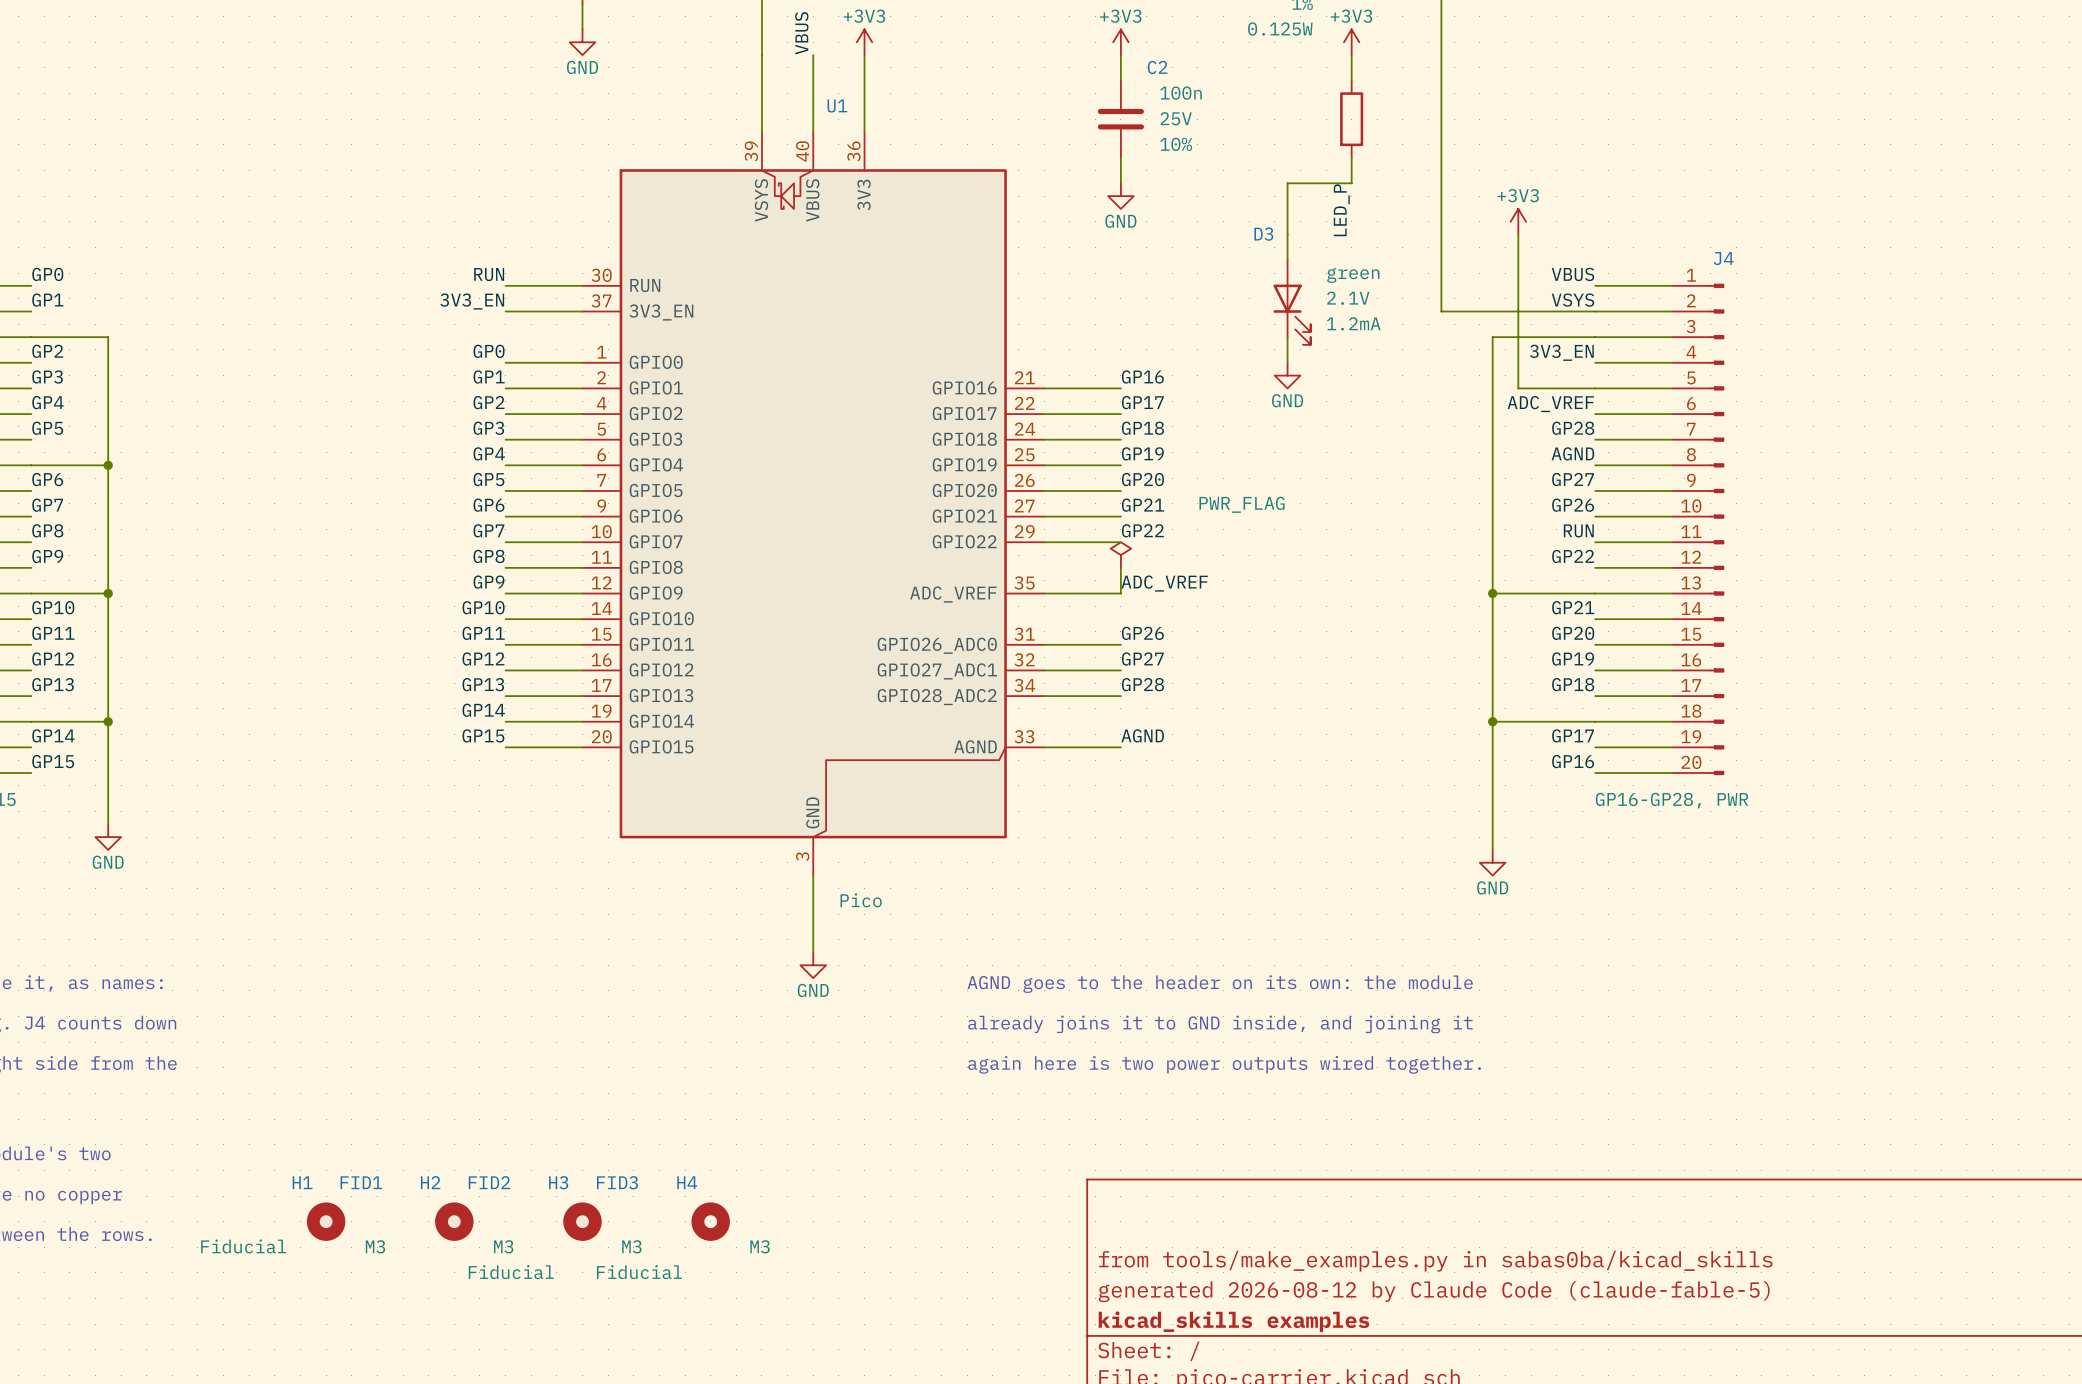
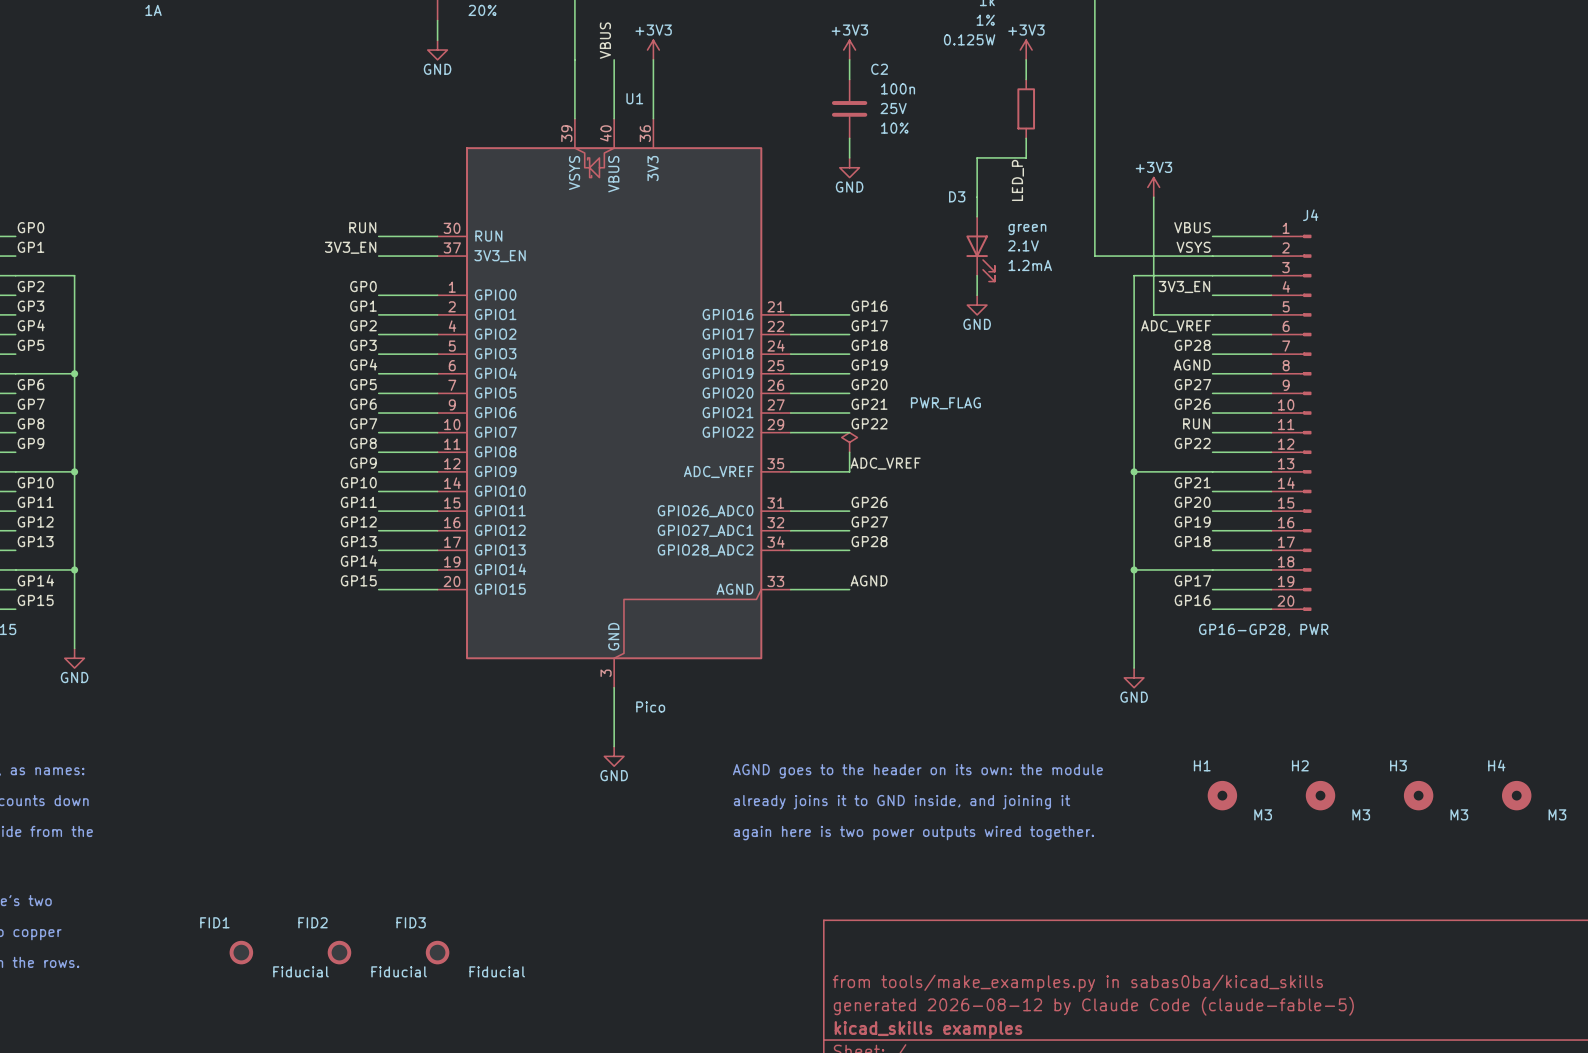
FID1 name position: FID1 (361, 1182) -> FID1 (214, 922)
FID2 name position: FID2 (489, 1182) -> FID2 (313, 922)
FID3 name position: FID3 (617, 1182) -> FID3 (411, 922)
H1 position: (326, 1221) -> (1222, 795)
H2 position: (454, 1221) -> (1320, 795)
H3 position: (582, 1221) -> (1418, 795)
H4 position: (710, 1221) -> (1516, 795)
FID1 value position: Fiducial (243, 1246) -> Fiducial (301, 971)
FID2 value position: Fiducial (511, 1272) -> Fiducial (399, 971)
FID3 value position: Fiducial (639, 1272) -> Fiducial (497, 971)

